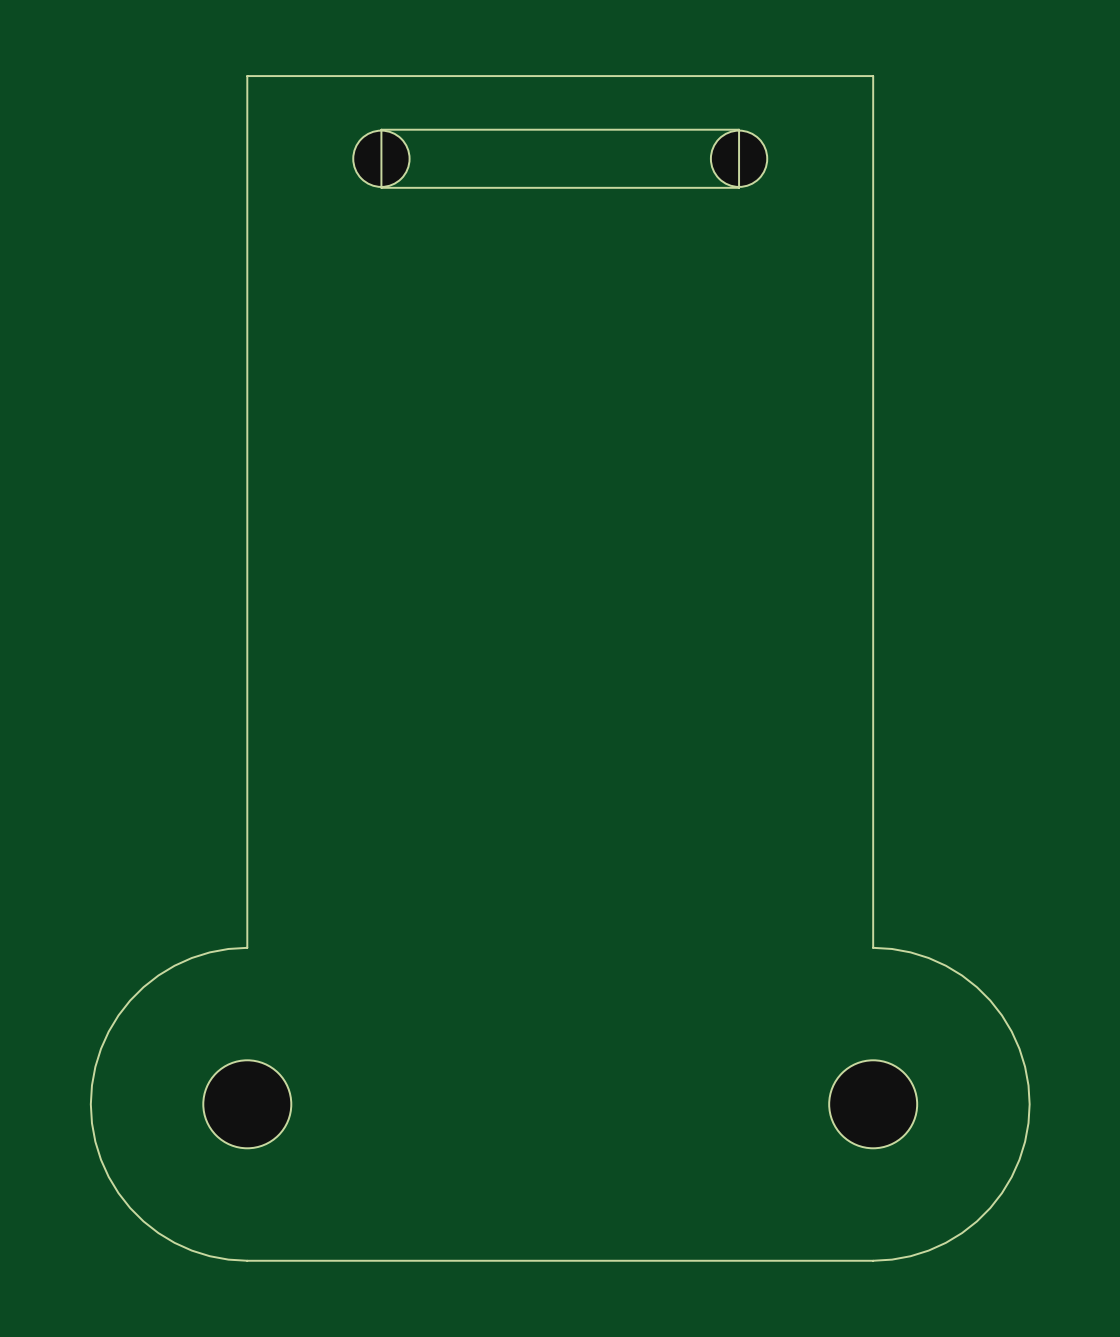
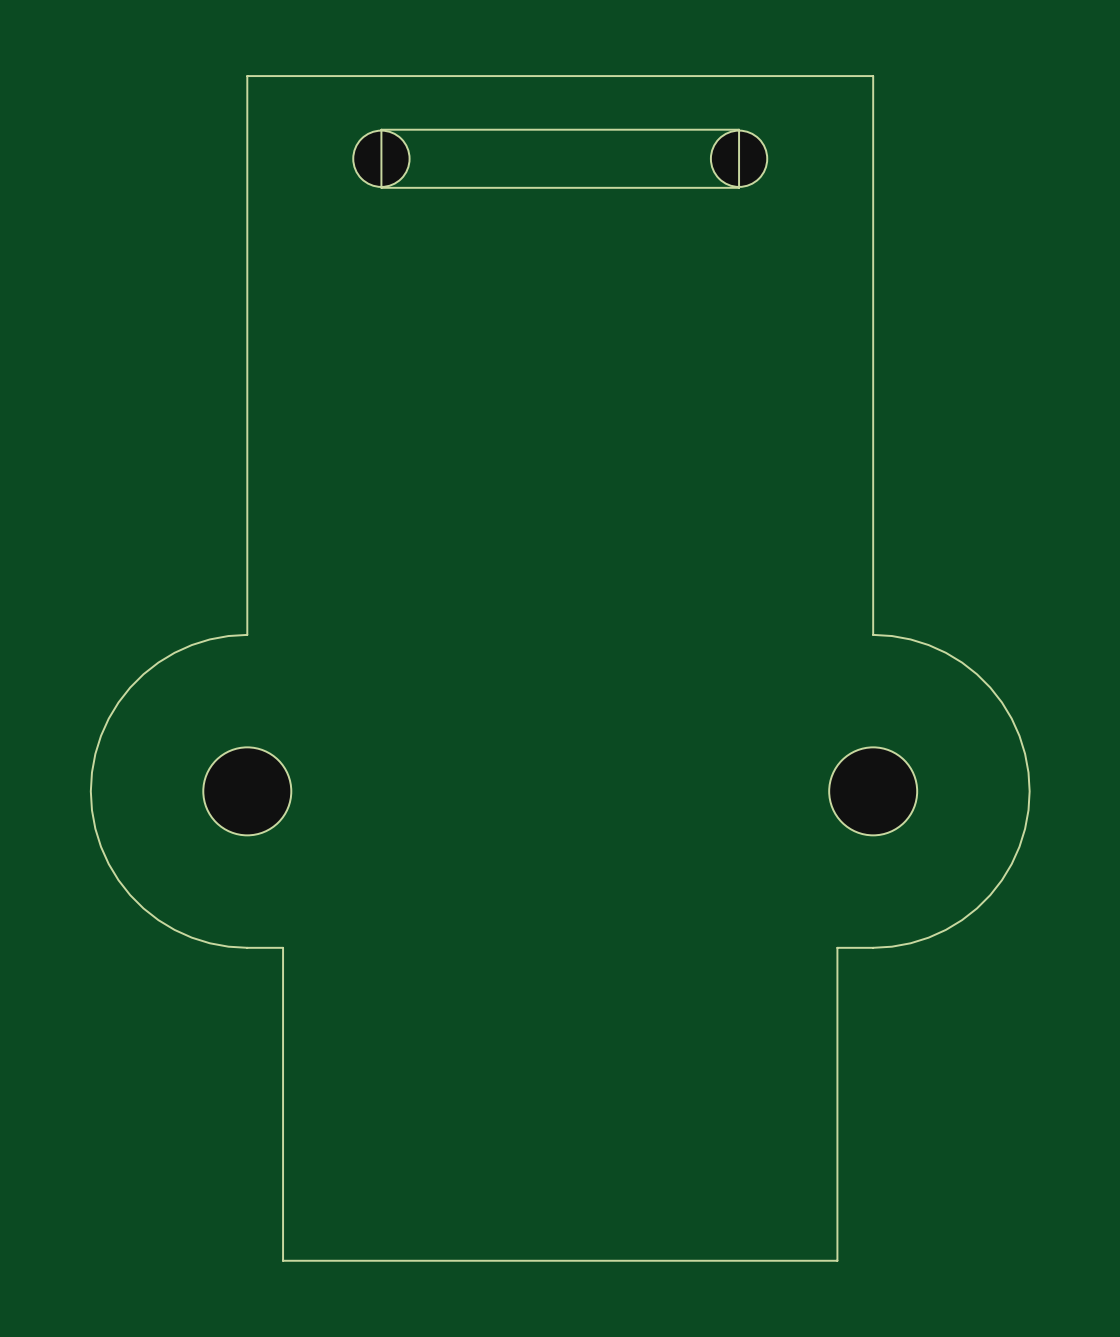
board edge: (247, 634) (247, 947) (228, 948) (191, 957) (174, 965) (143, 987) (130, 1000) (108, 1031) (95, 1066) (90, 1104) (95, 1141) (108, 1177) (130, 1208) (143, 1221) (174, 1242) (209, 1256) (228, 1259) (283, 1260) -> (247, 634) (228, 636) (191, 645) (174, 652) (143, 674) (130, 687) (108, 718) (95, 753) (90, 791) (95, 828) (108, 864) (130, 895) (143, 908) (174, 929) (209, 943) (228, 946) (283, 947) (283, 1260)
board edge: (873, 634) (873, 947) (910, 952) (945, 965) (976, 987) (990, 1000) (1011, 1031) (1019, 1048) (1028, 1085) (1029, 1104) (1025, 1141) (1011, 1177) (990, 1208) (976, 1221) (945, 1242) (910, 1256) (892, 1259) (837, 1260) -> (873, 634) (910, 639) (945, 652) (976, 674) (990, 687) (1011, 718) (1019, 735) (1028, 772) (1029, 791) (1025, 828) (1011, 864) (990, 895) (976, 908) (945, 929) (910, 943) (892, 946) (837, 947) (837, 1260)
hole position: (247, 1104) -> (247, 791)
hole position: (873, 1104) -> (873, 791)

